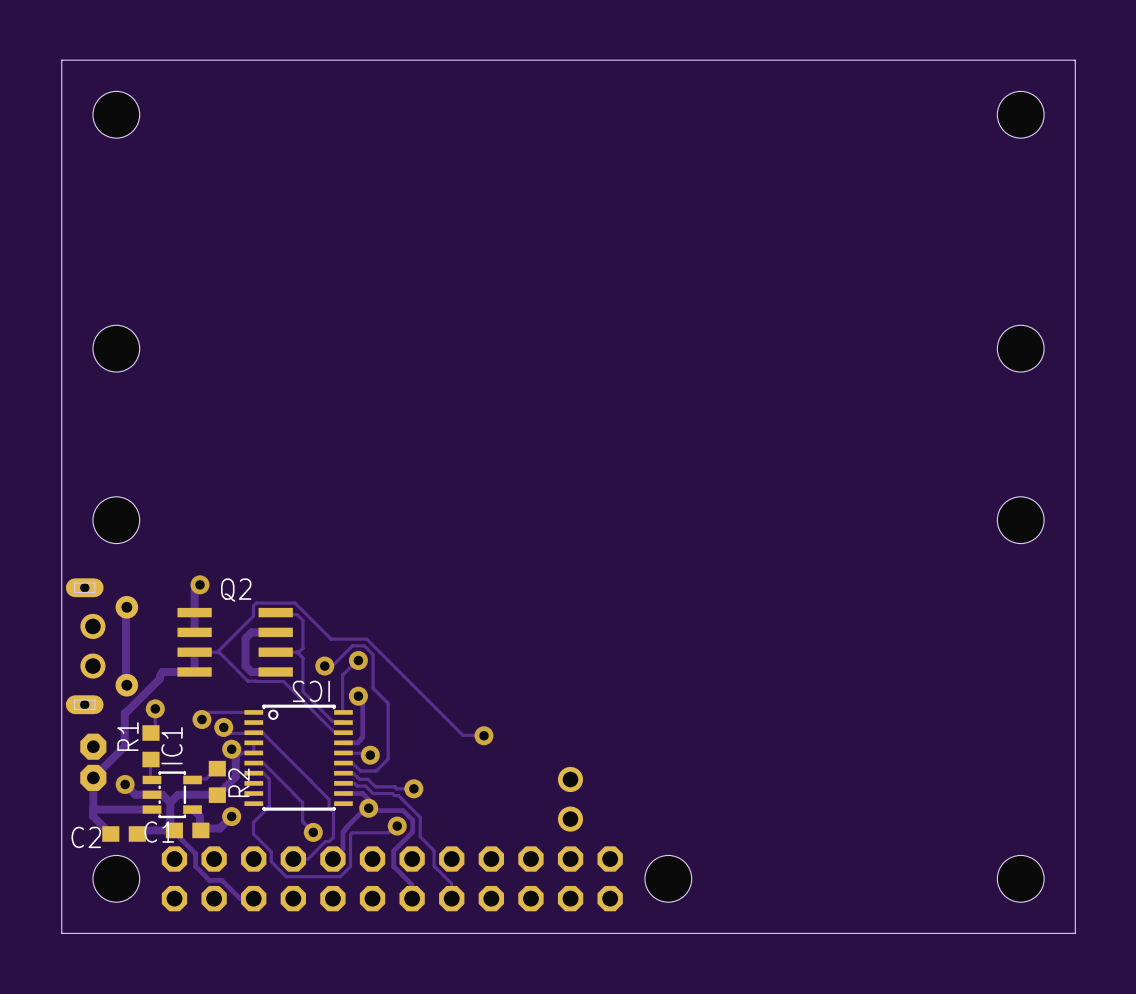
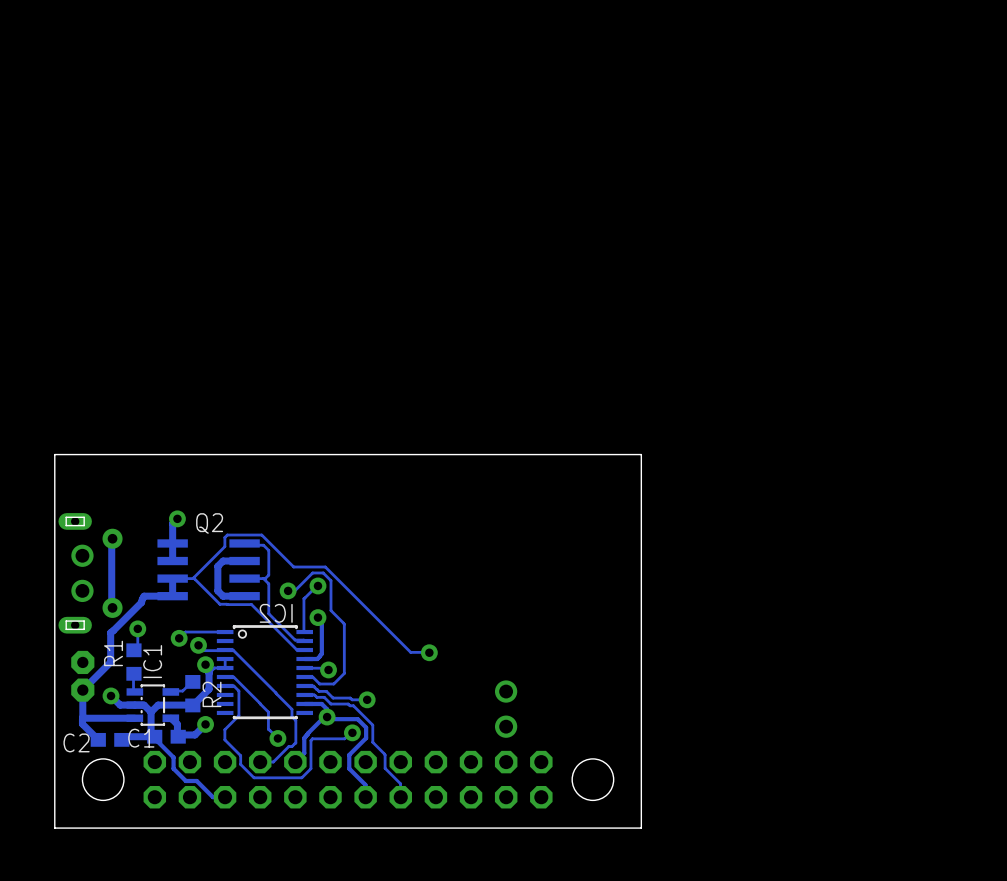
hole: (116, 114) -> none
hole: (1020, 114) -> none
hole: (116, 348) -> none
hole: (1020, 348) -> none
board edge: (61, 512) (61, 60) (1075, 60) (1075, 933) (722, 933) -> (54, 454) (641, 454) (641, 828)
hole: (116, 520) -> none
hole: (1020, 520) -> none
hole: (1020, 878) -> none

